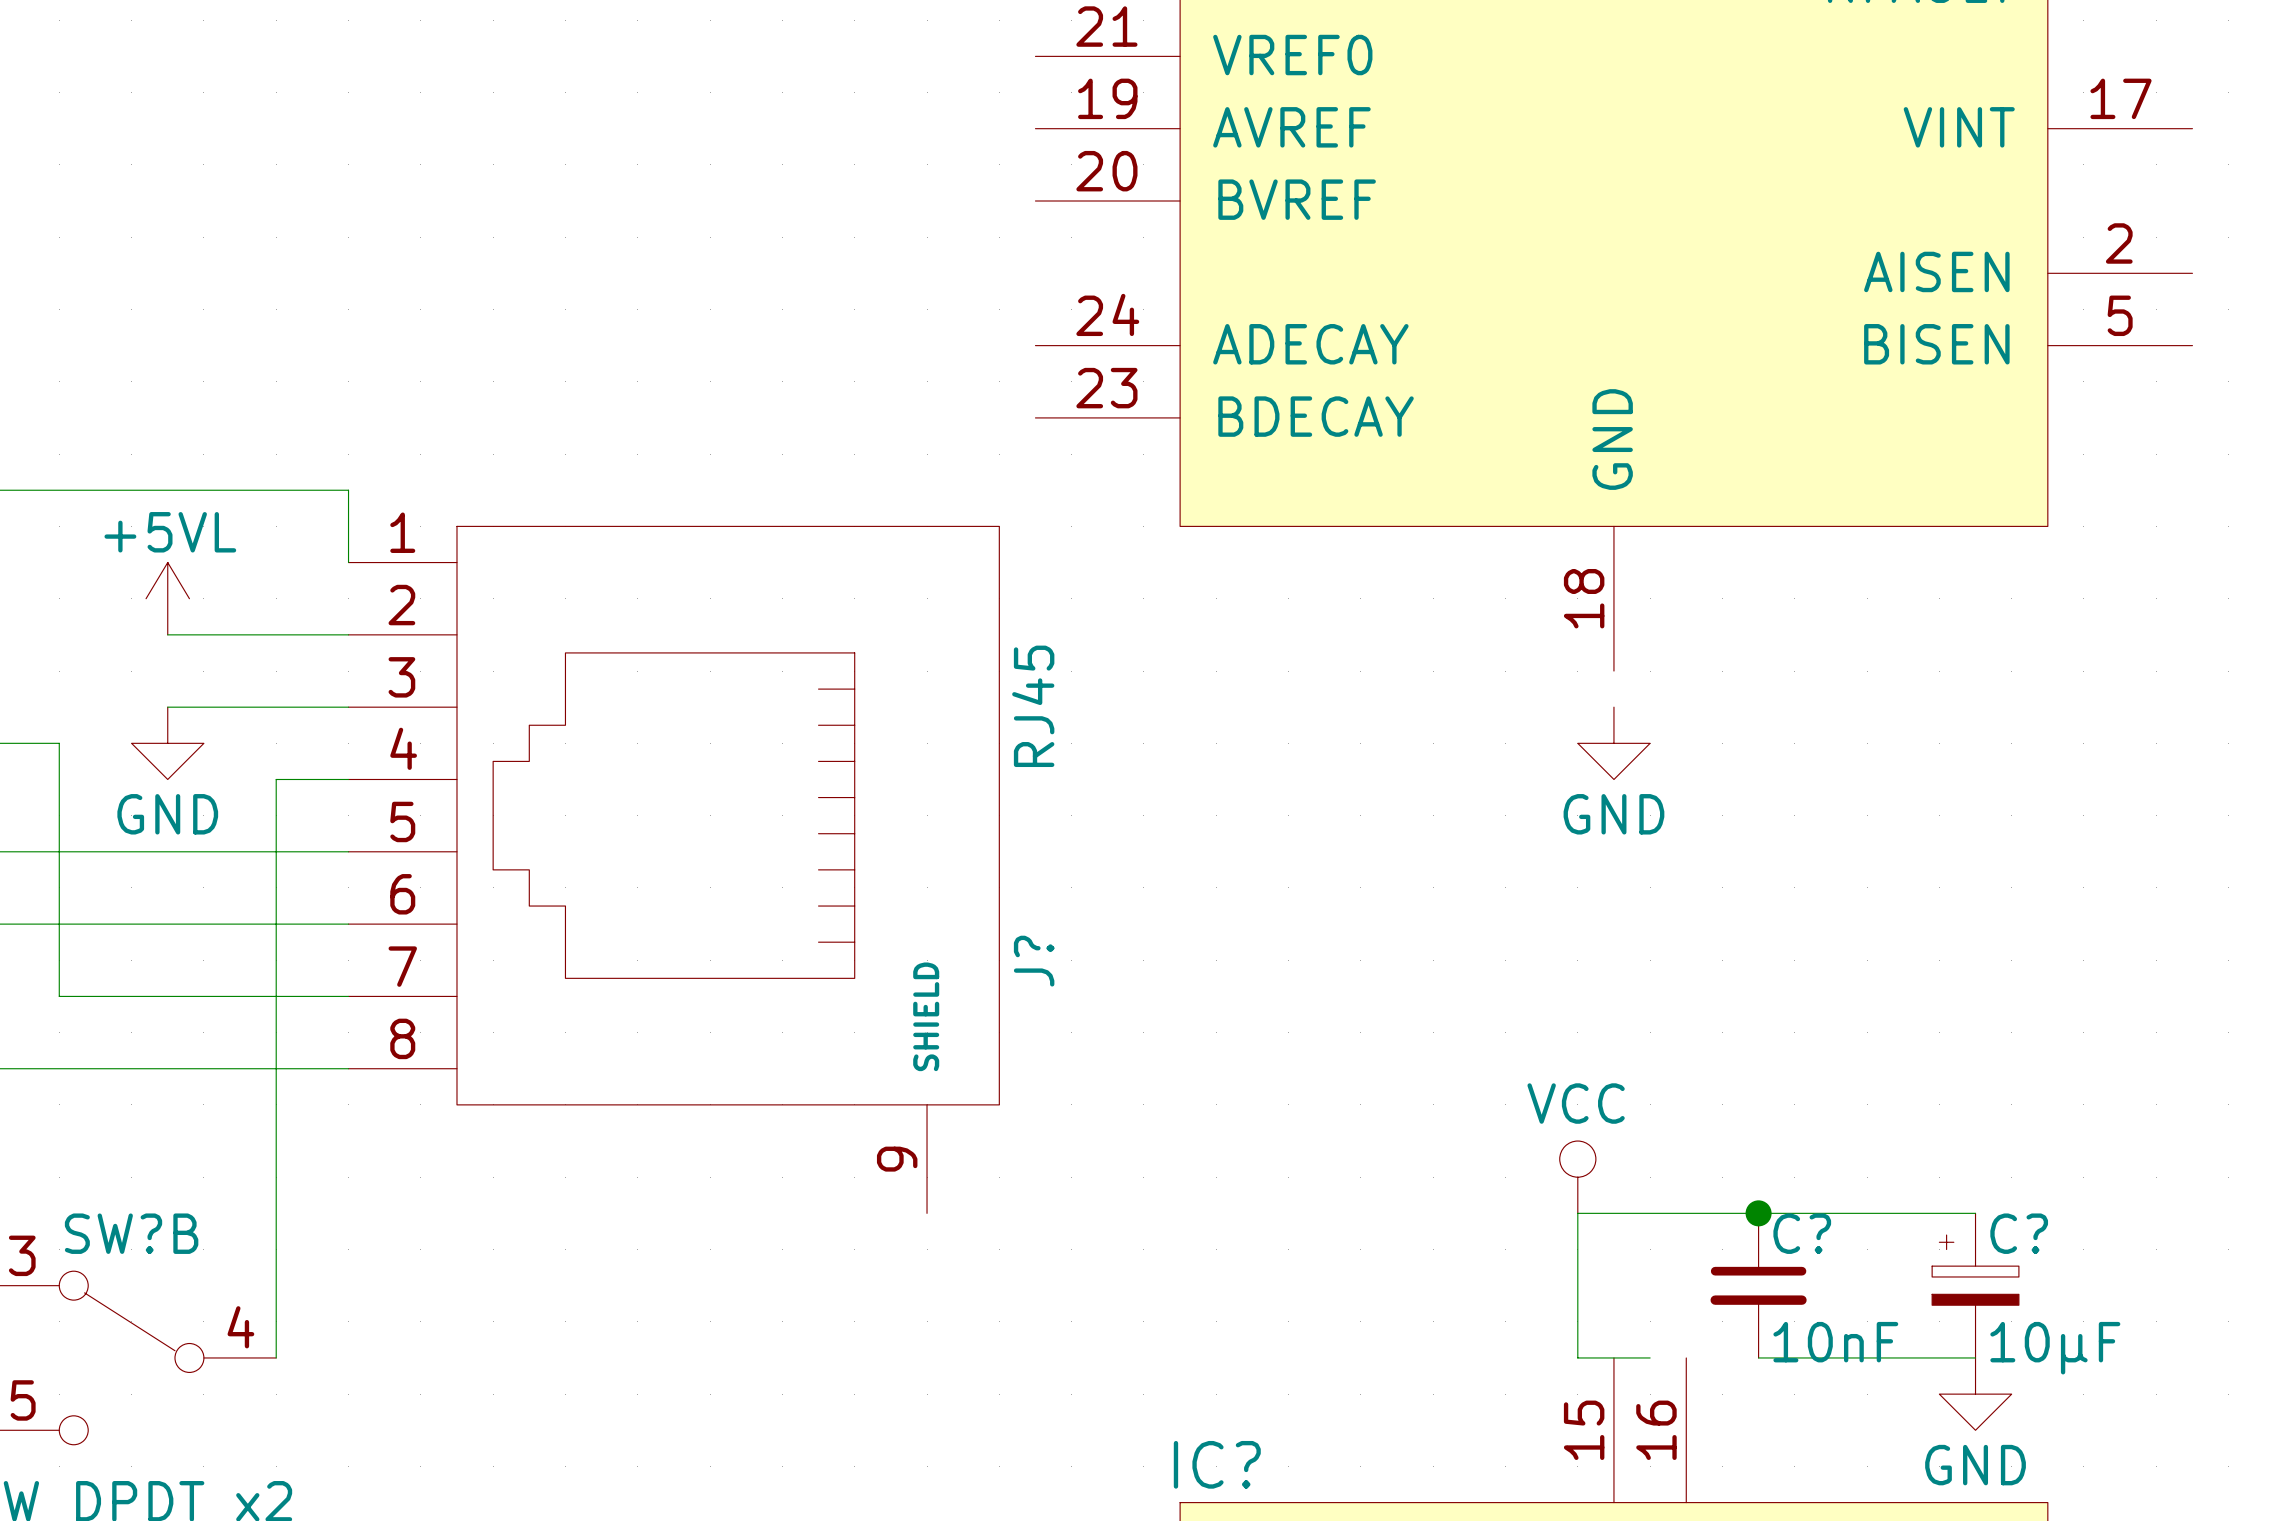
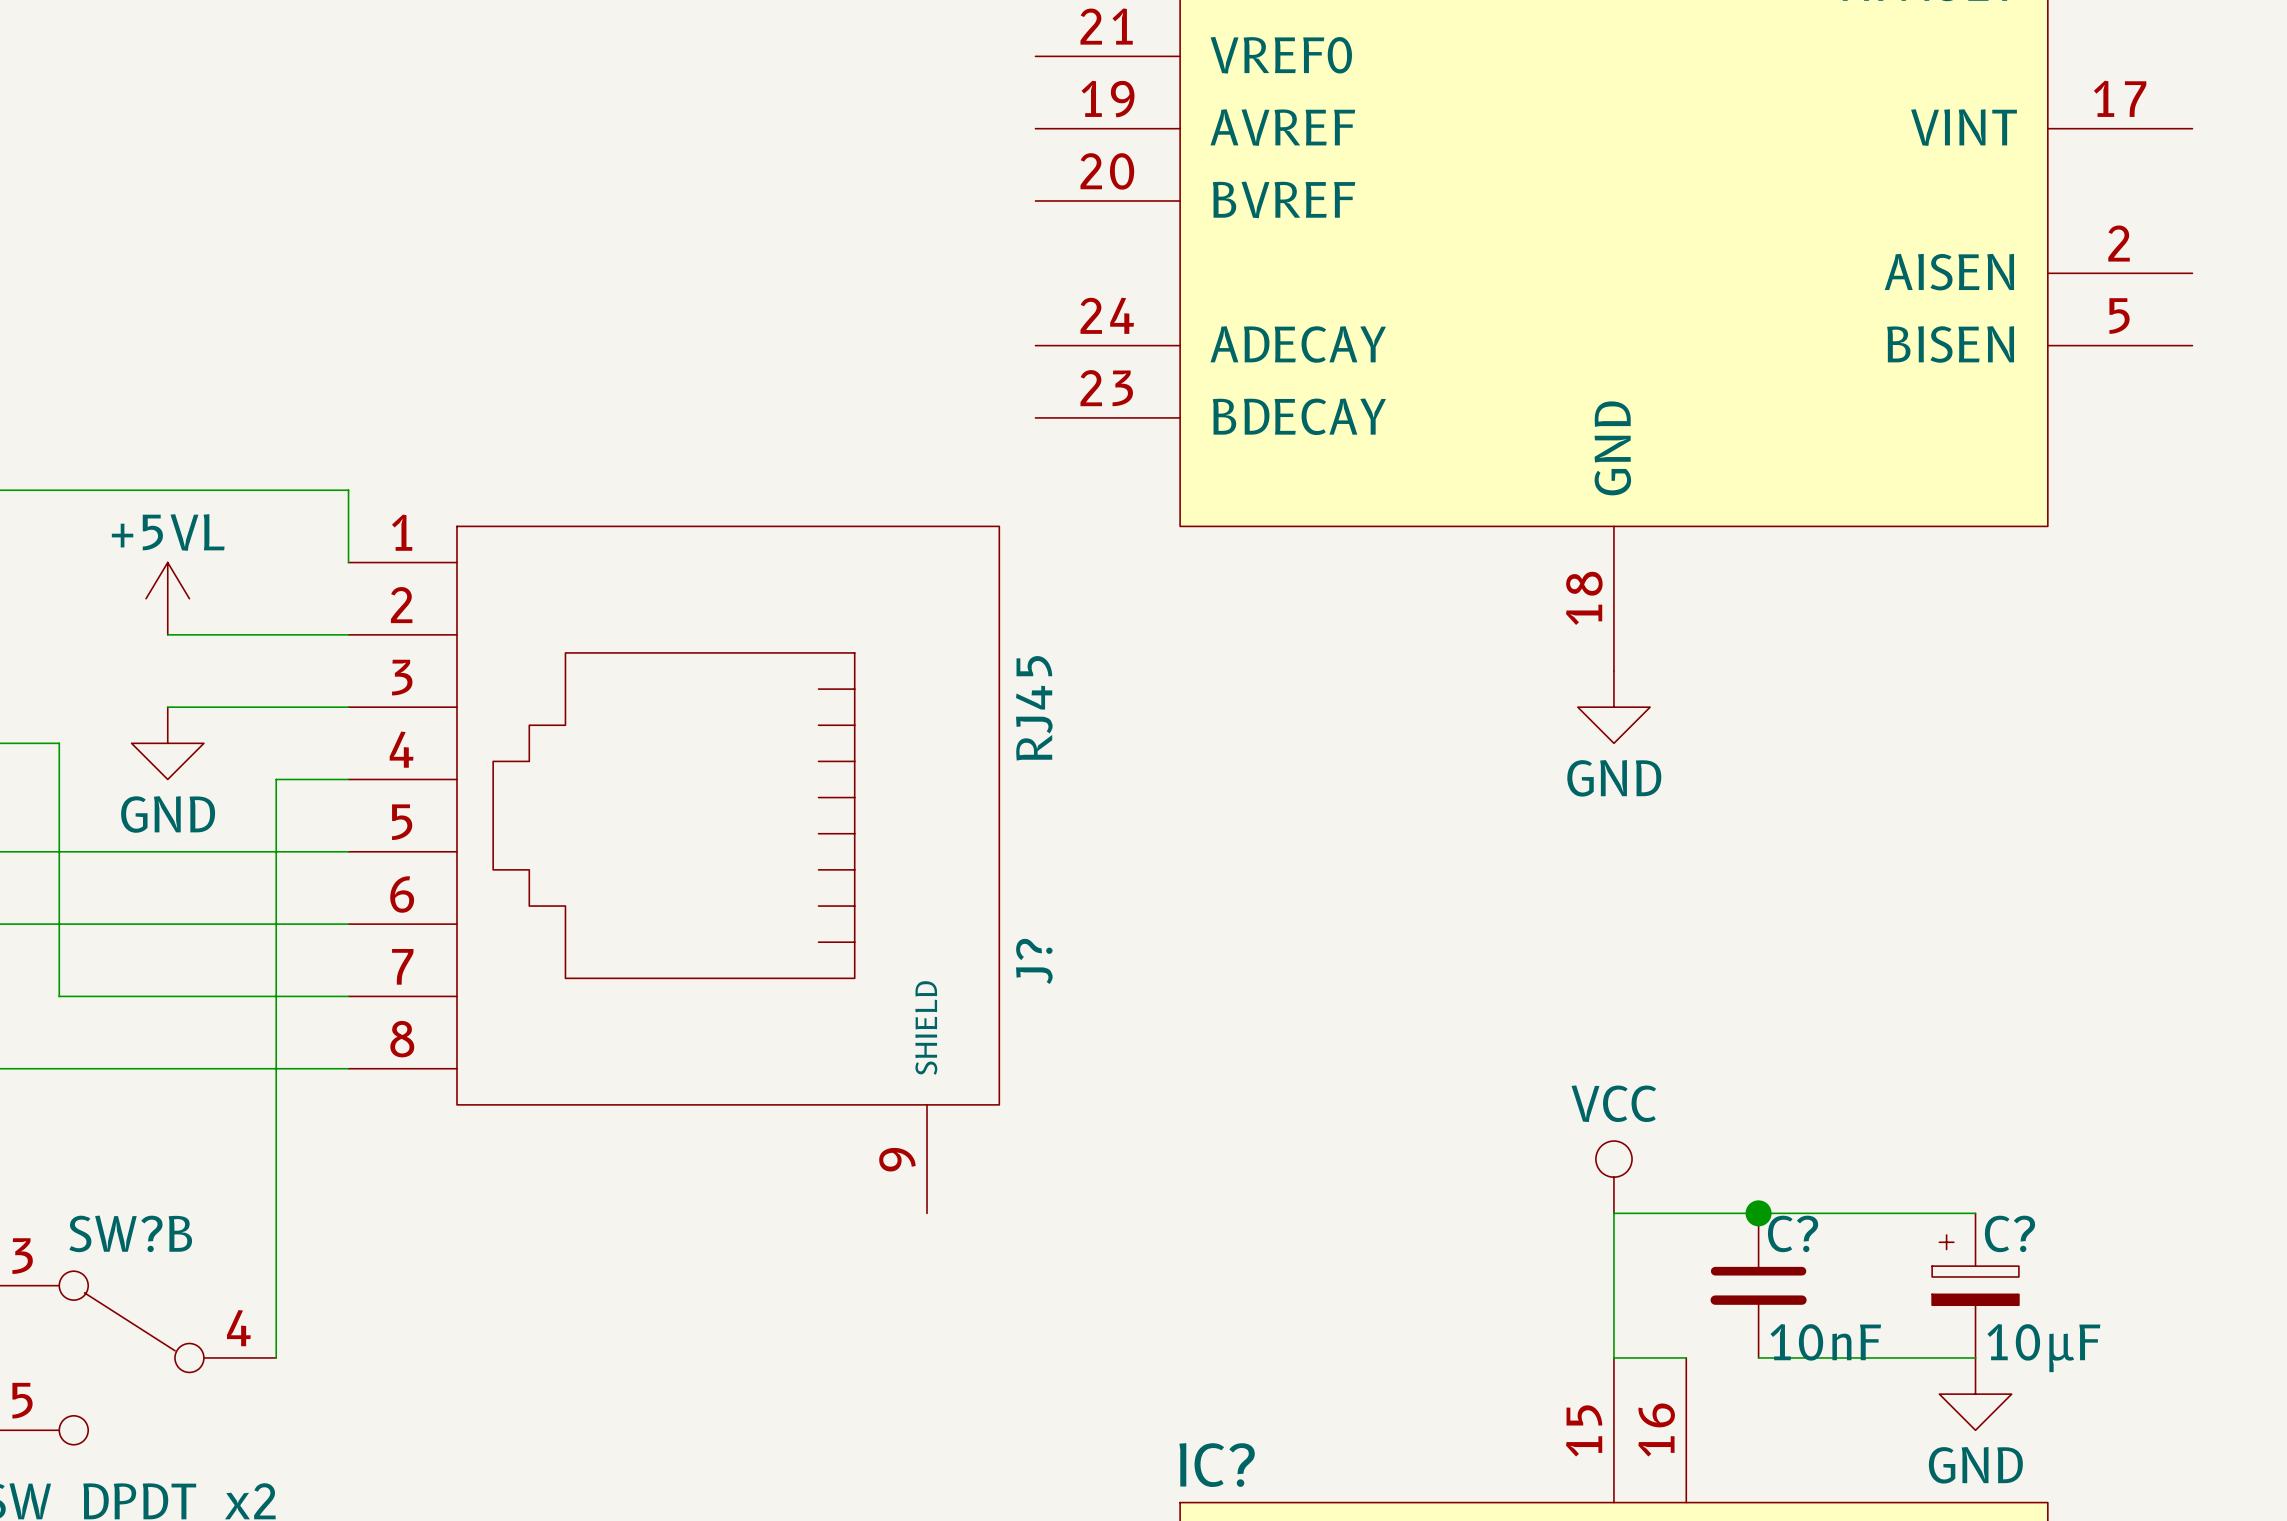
power symbol position: GND (1613, 743) -> GND (1613, 707)
power symbol position: VCC (1577, 1177) -> VCC (1613, 1177)
wire: (1613, 1213) (1577, 1213) (1577, 1357) (1613, 1357) -> (1613, 1213) (1613, 1357)
wire: none -> (1650, 1357) (1686, 1357)

